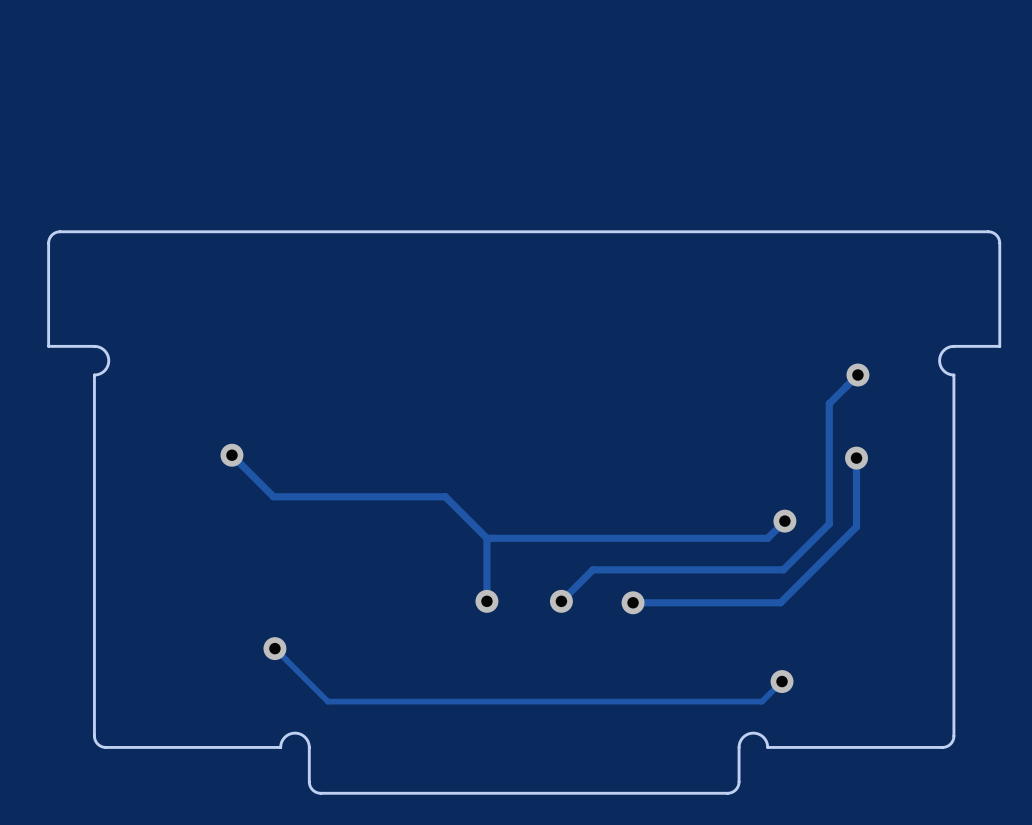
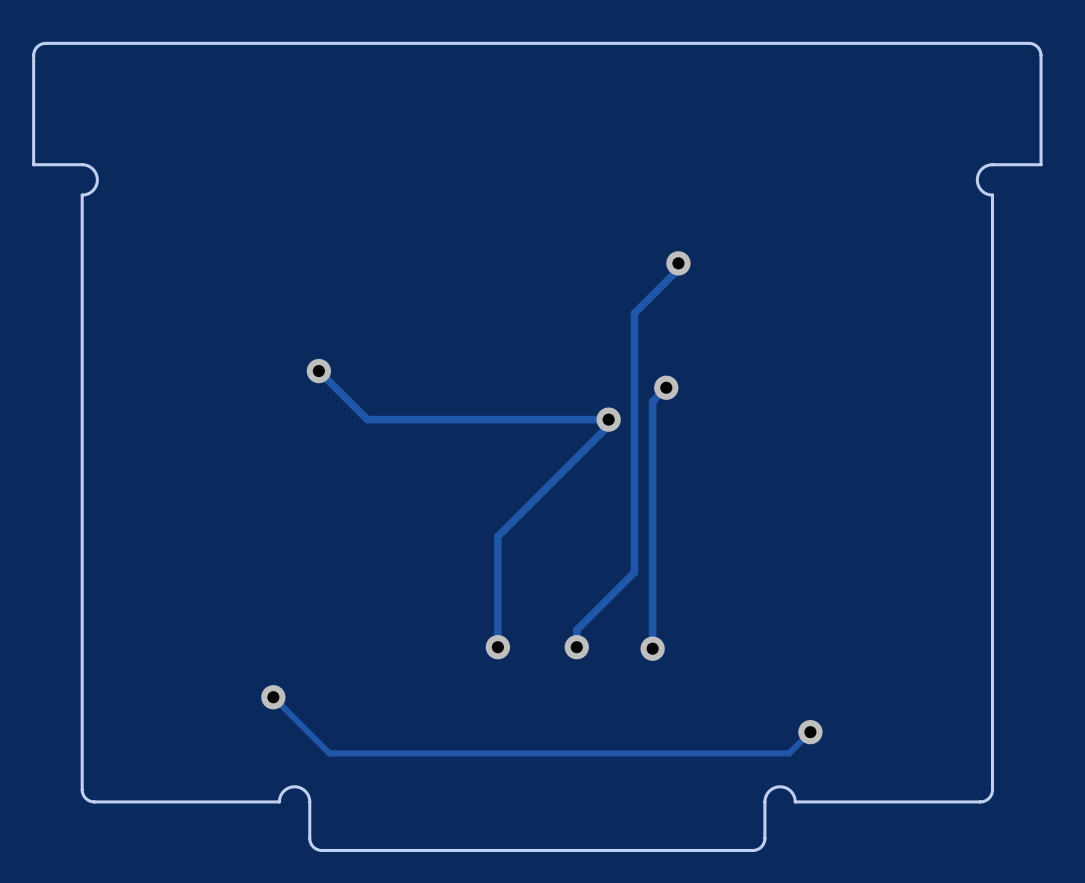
via: none -> (678, 263)
track: none -> (318, 371) (367, 419) (608, 419) (608, 425) (497, 536) (497, 580)
via: none -> (666, 387)
track: (857, 375) (829, 403) (829, 523) (783, 569) (592, 569) (561, 601) -> (678, 263) (678, 269) (634, 313) (634, 572) (576, 630) (576, 647)
via: (857, 375) -> none
board edge: (953, 375) (945, 372) (940, 364) (940, 355) (946, 348) (953, 346) (999, 346) (999, 241) (996, 235) (991, 232) (57, 232) (51, 235) (48, 241) (48, 346) (94, 346) (101, 348) (107, 355) (108, 364) (103, 372) (94, 375) -> (992, 407) (992, 195) (981, 190) (977, 183) (977, 177) (981, 169) (988, 165) (1041, 164) (1040, 53) (1037, 46) (1030, 43) (41, 44) (36, 48) (33, 55) (33, 164) (86, 165) (92, 169) (97, 177) (96, 183) (92, 190) (82, 195) (82, 407)
via: none -> (608, 419)
track: (231, 455) (273, 496) (445, 496) (486, 538) (767, 538) (784, 521) -> none
via position: (231, 455) -> (318, 371)
track: (856, 458) (856, 526) (780, 602) (633, 602) -> (666, 387) (652, 401) (652, 648)
via: (856, 458) -> none
via: (784, 521) -> none

